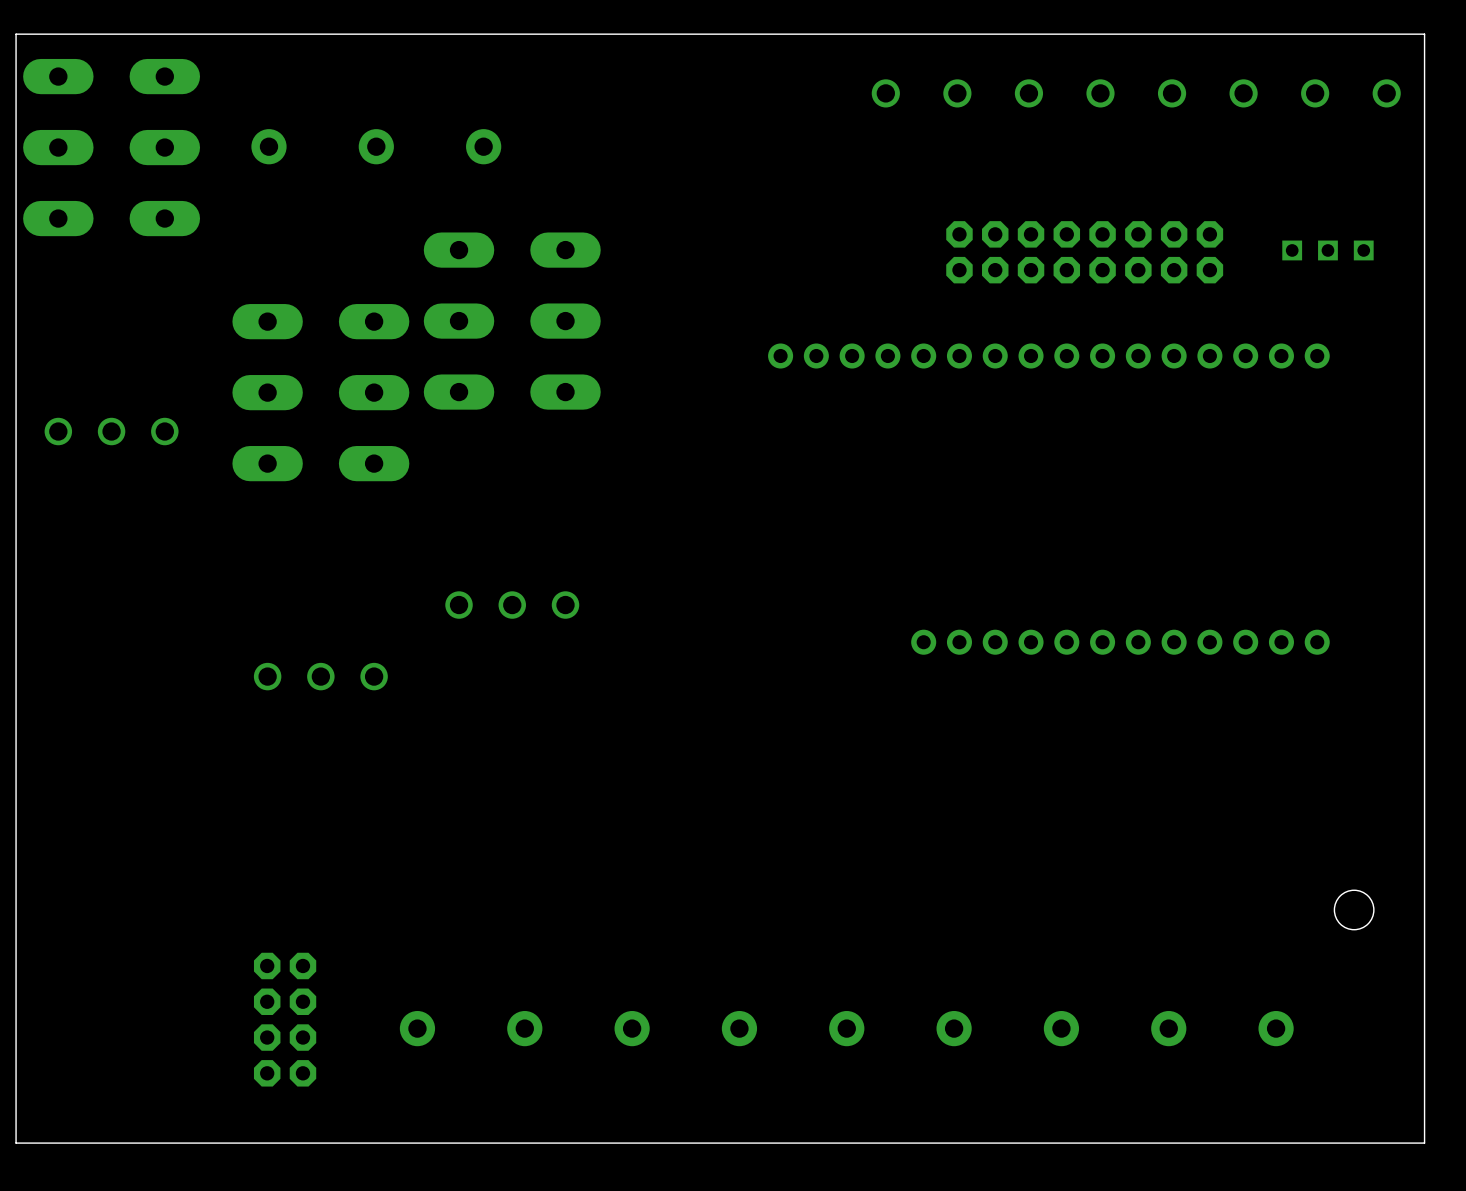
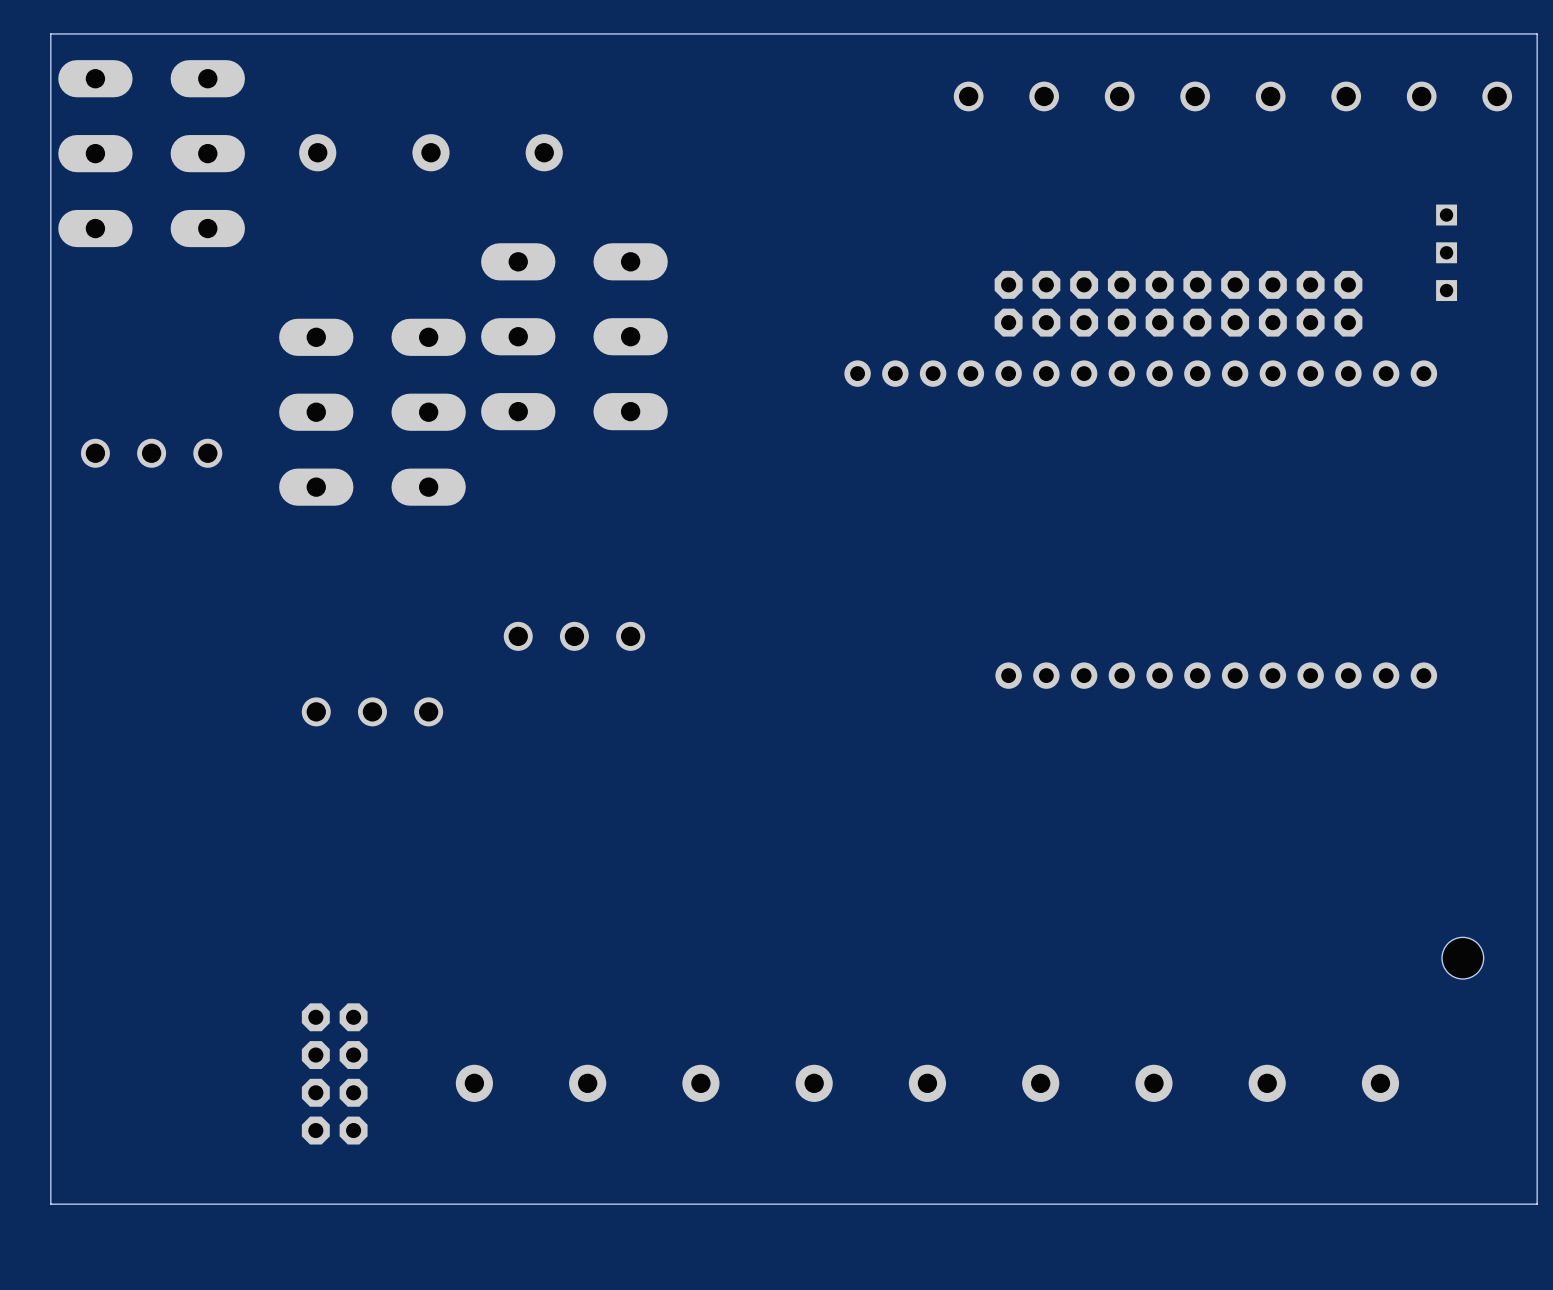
part rotation: 0° (1327, 250) -> 90° clockwise (1446, 252)
part: (1084, 252) -> none
part: none -> (1178, 303)

